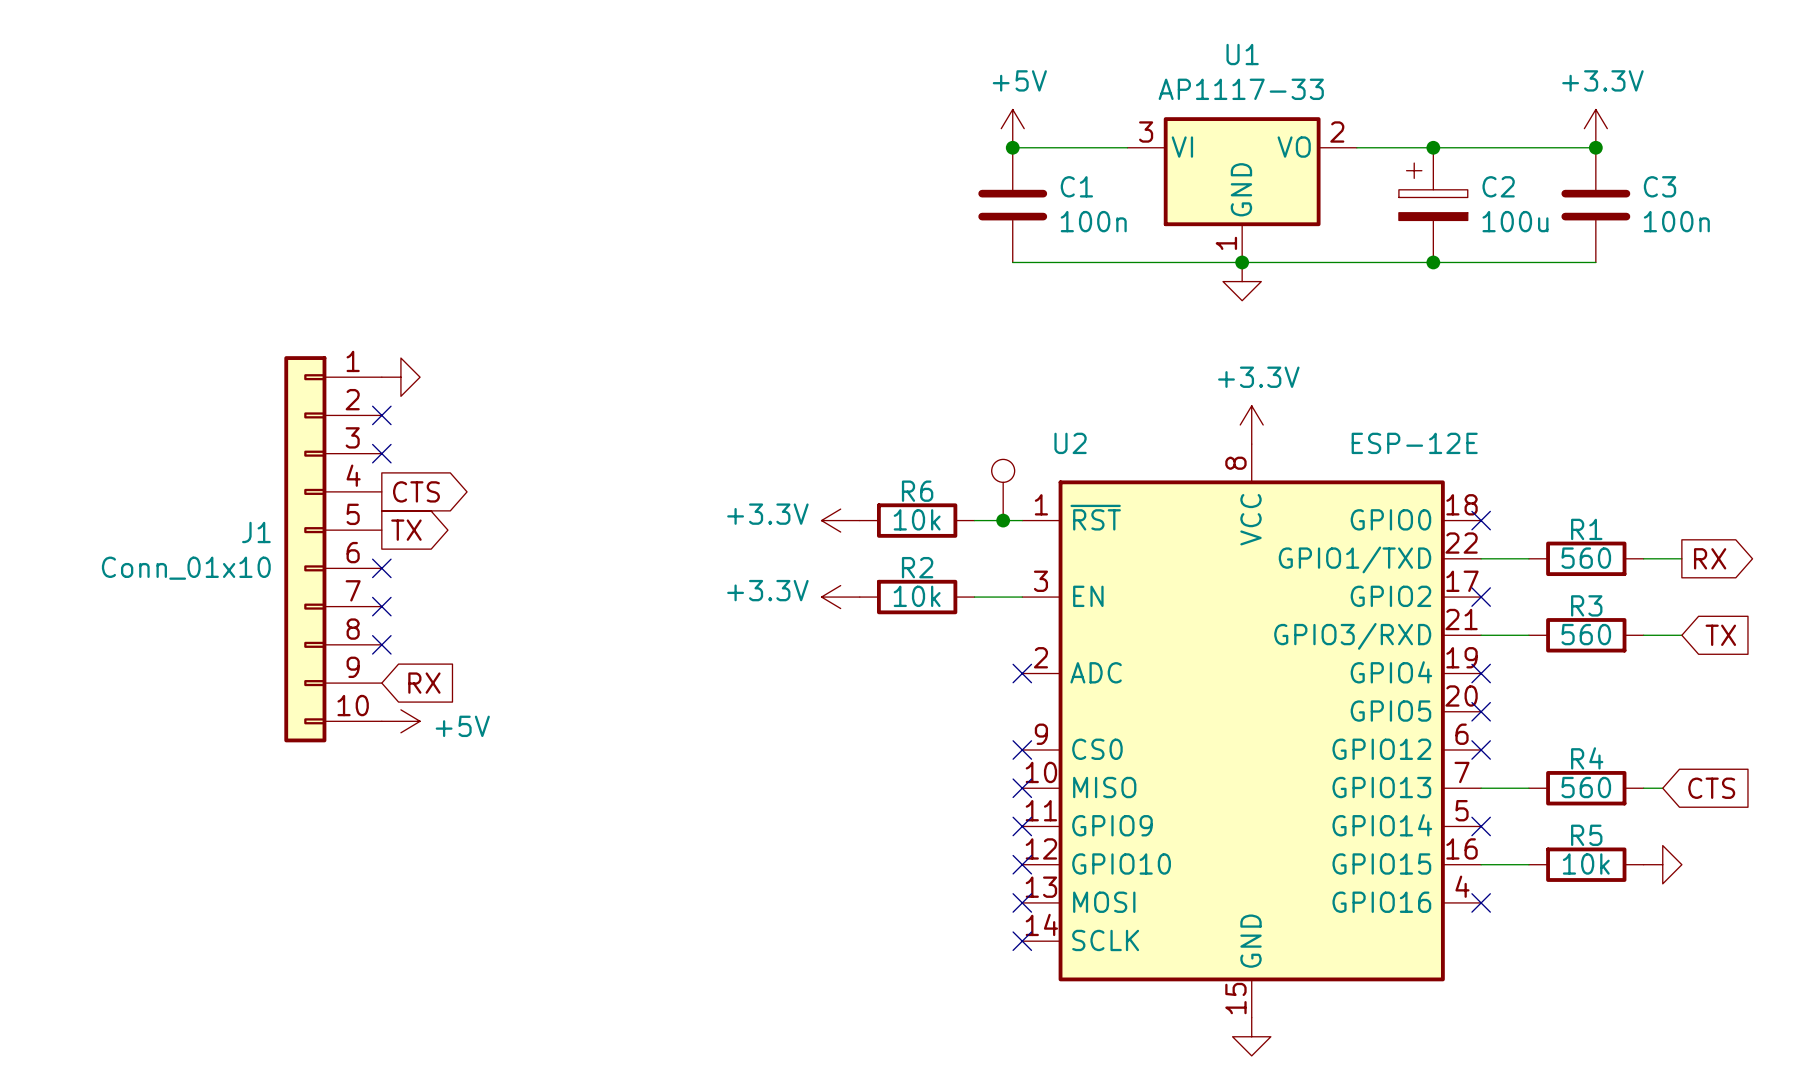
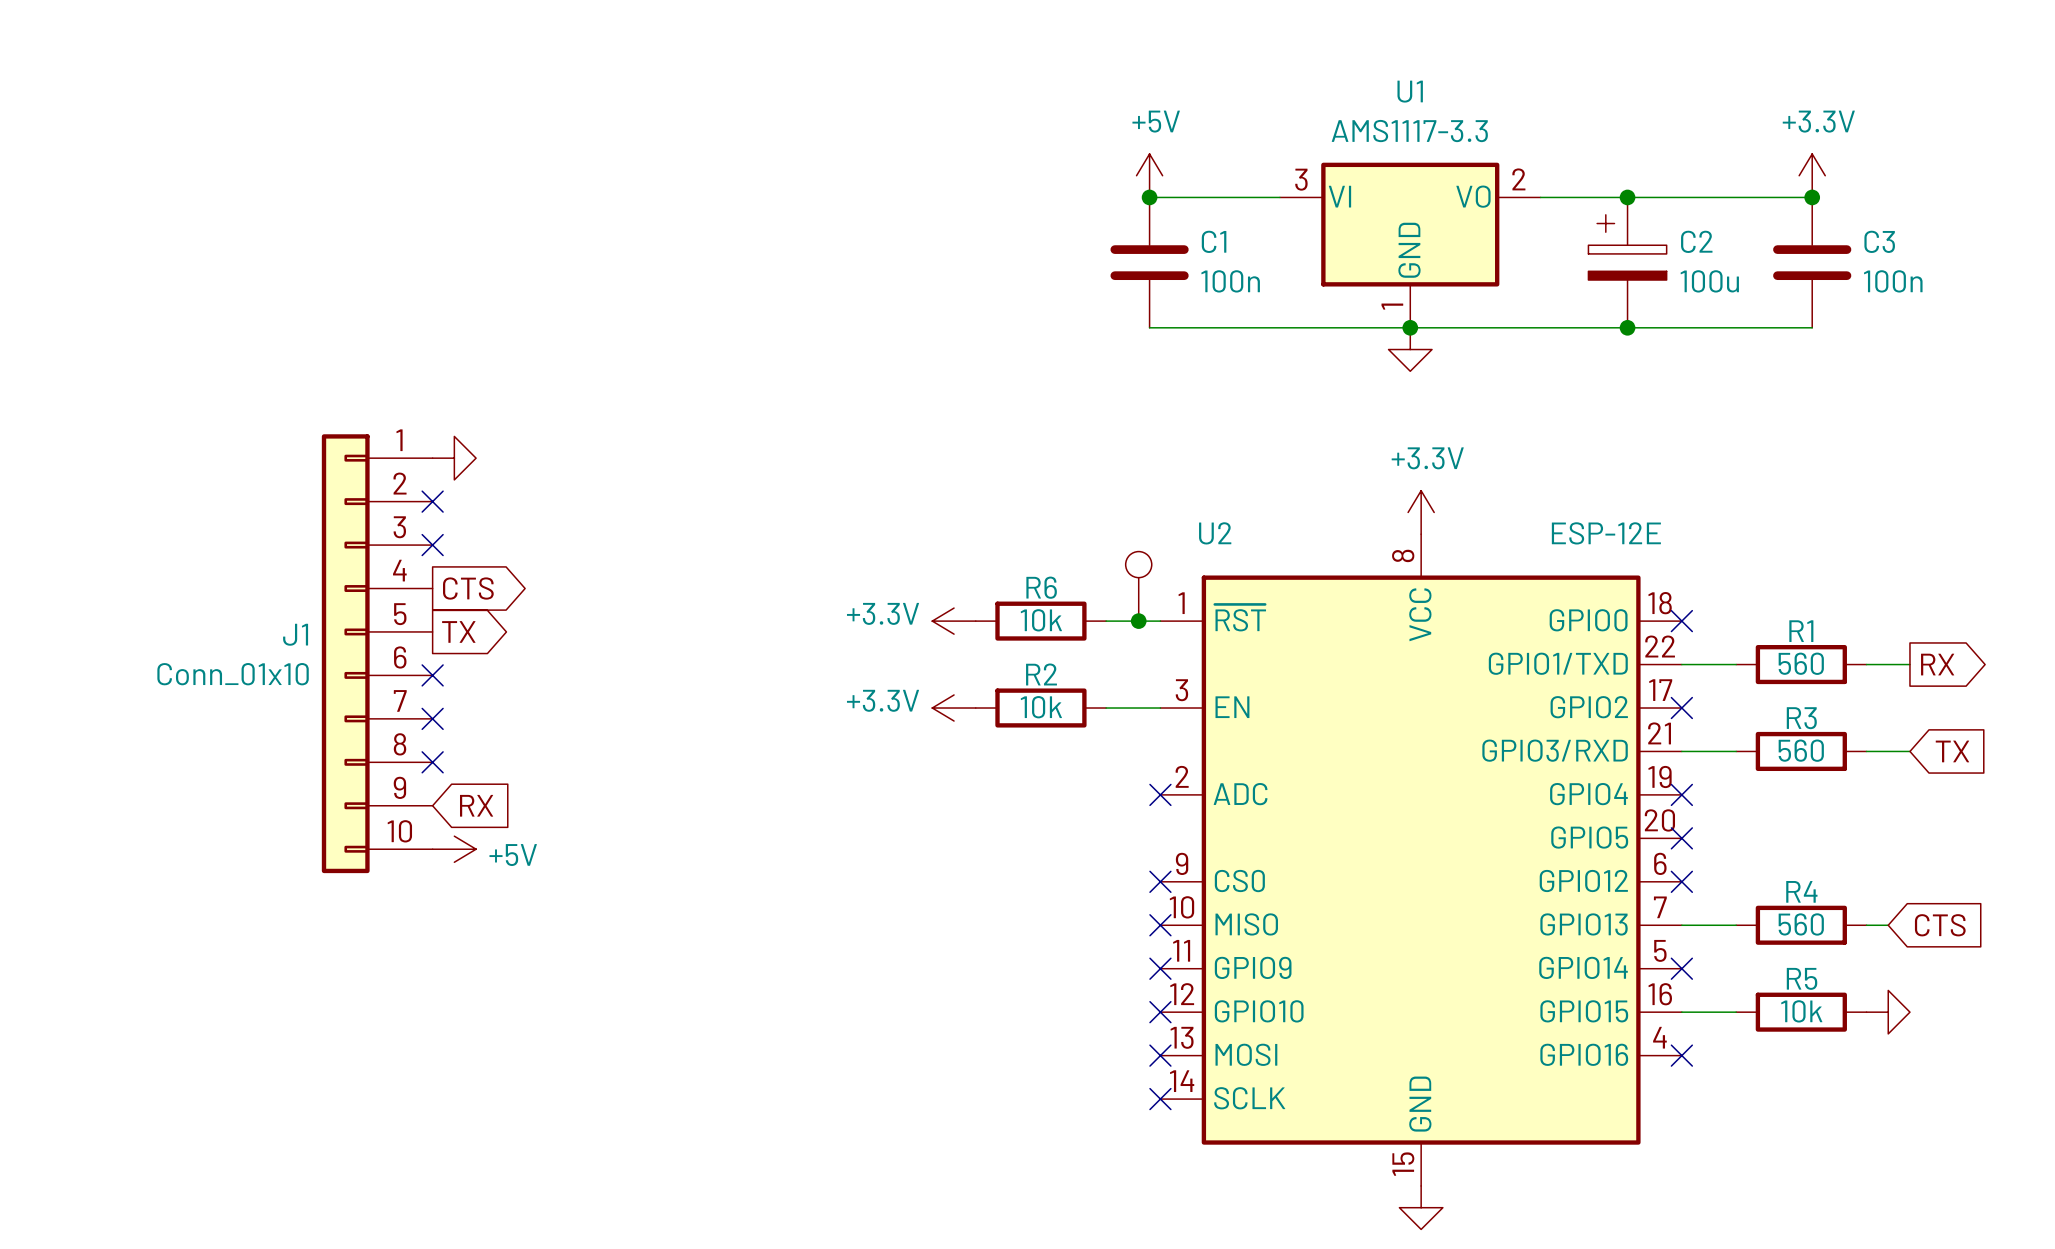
U1 value: AP1117-33 (1241, 89) -> AMS1117-3.3 (1409, 131)

